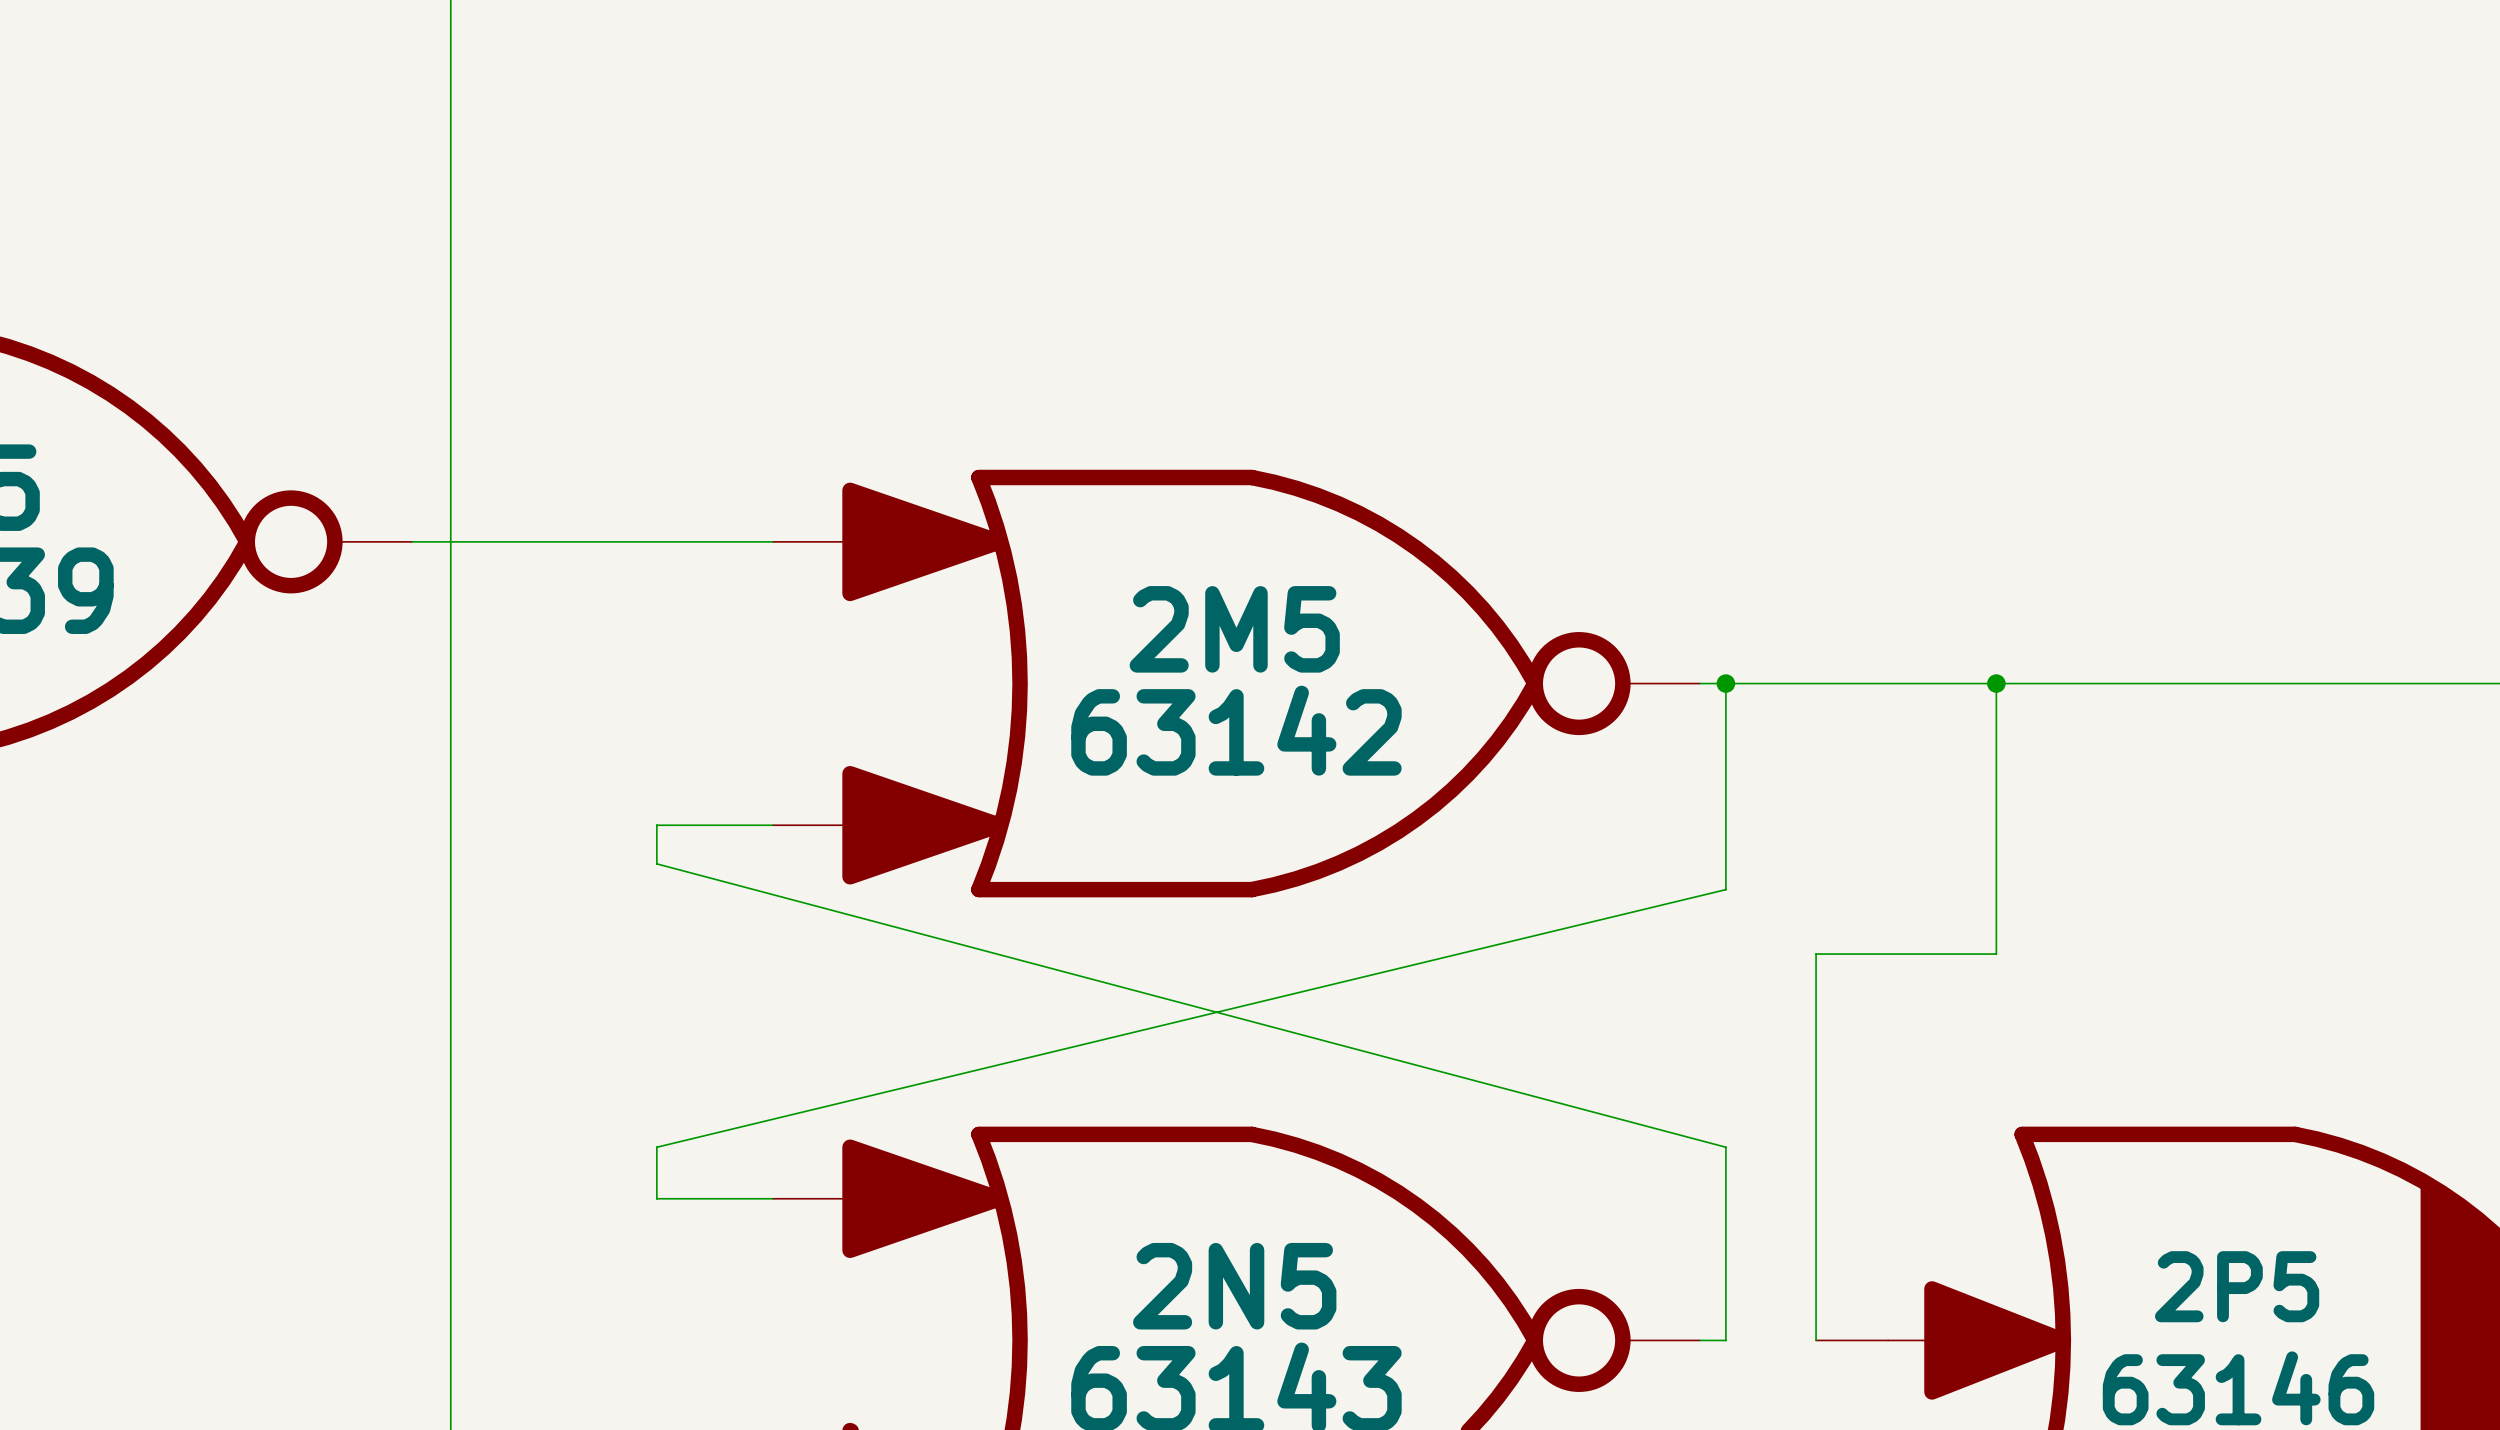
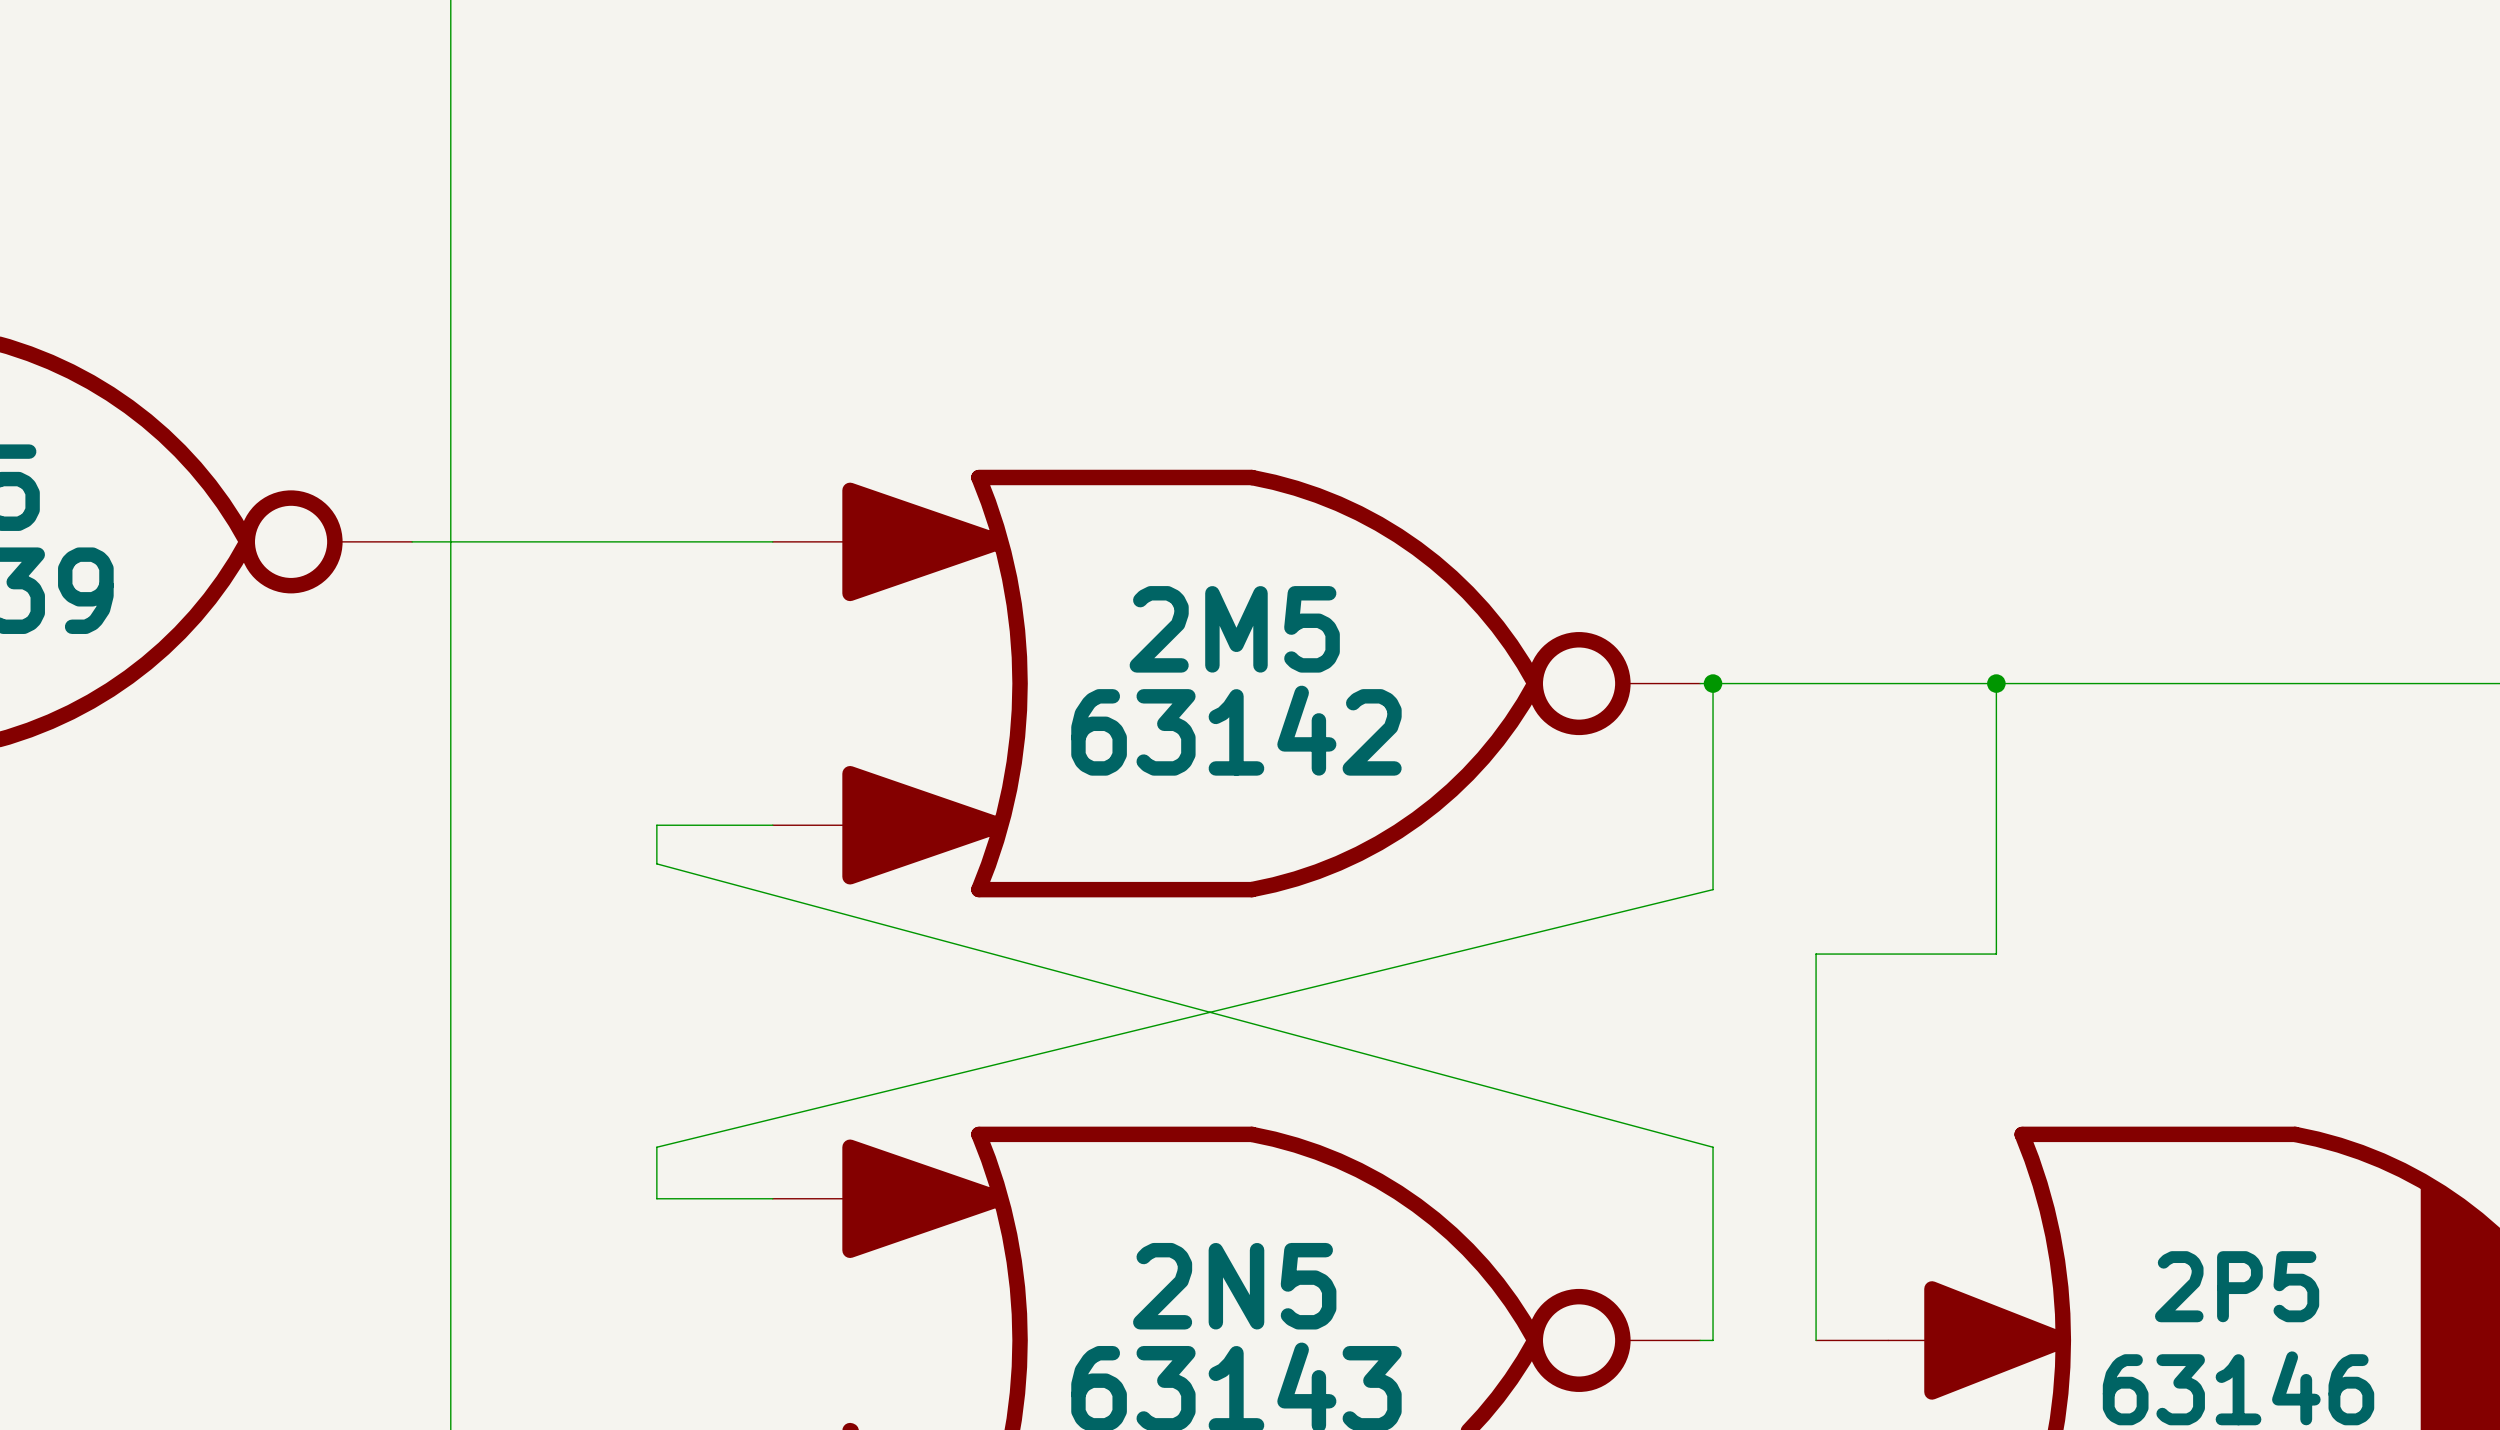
wire: (1725, 683) (1725, 889) (656, 1147) -> (1713, 683) (1713, 889) (656, 1147)
junction position: (1725, 683) -> (1713, 683)
wire: (656, 863) (1725, 1147) (1725, 1340) (1713, 1340) -> (656, 863) (1713, 1147) (1713, 1340)

